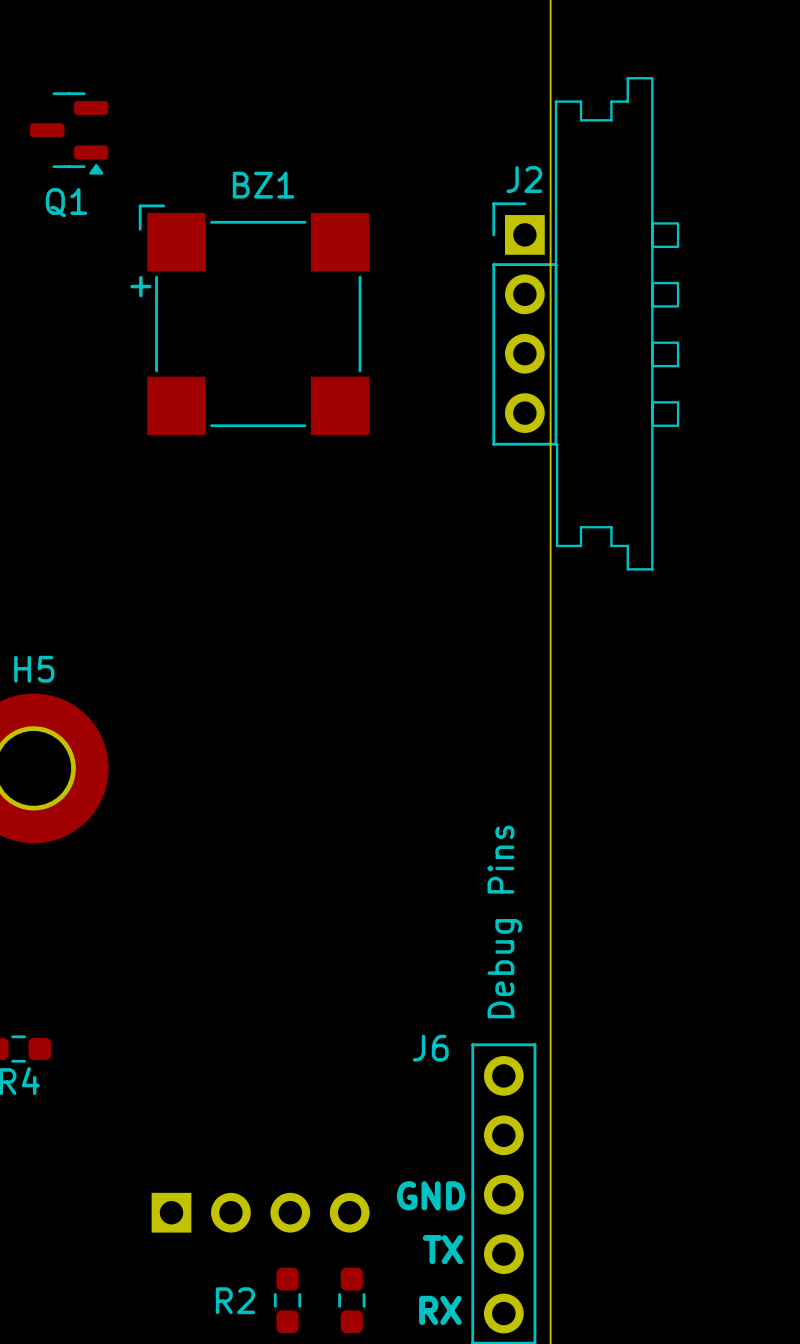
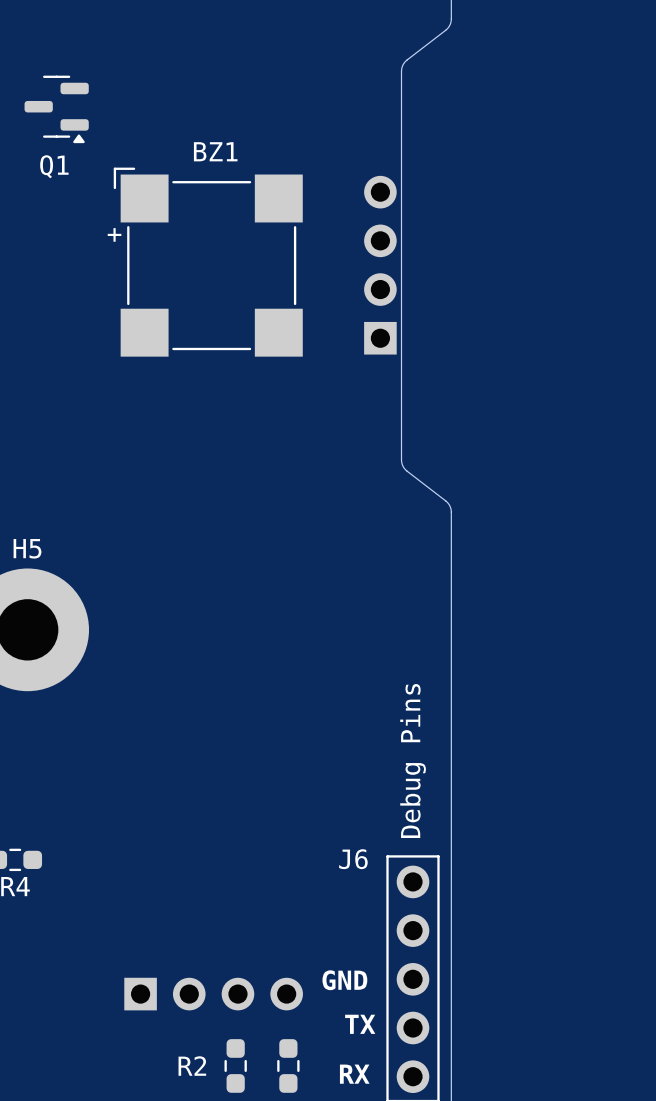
board edge: (550, 23) (550, 624) -> (451, 18) (446, 29) (405, 61) (401, 71) (401, 461) (405, 470) (446, 501) (451, 512)
J2 side: top (585, 323) -> bottom (380, 265)

